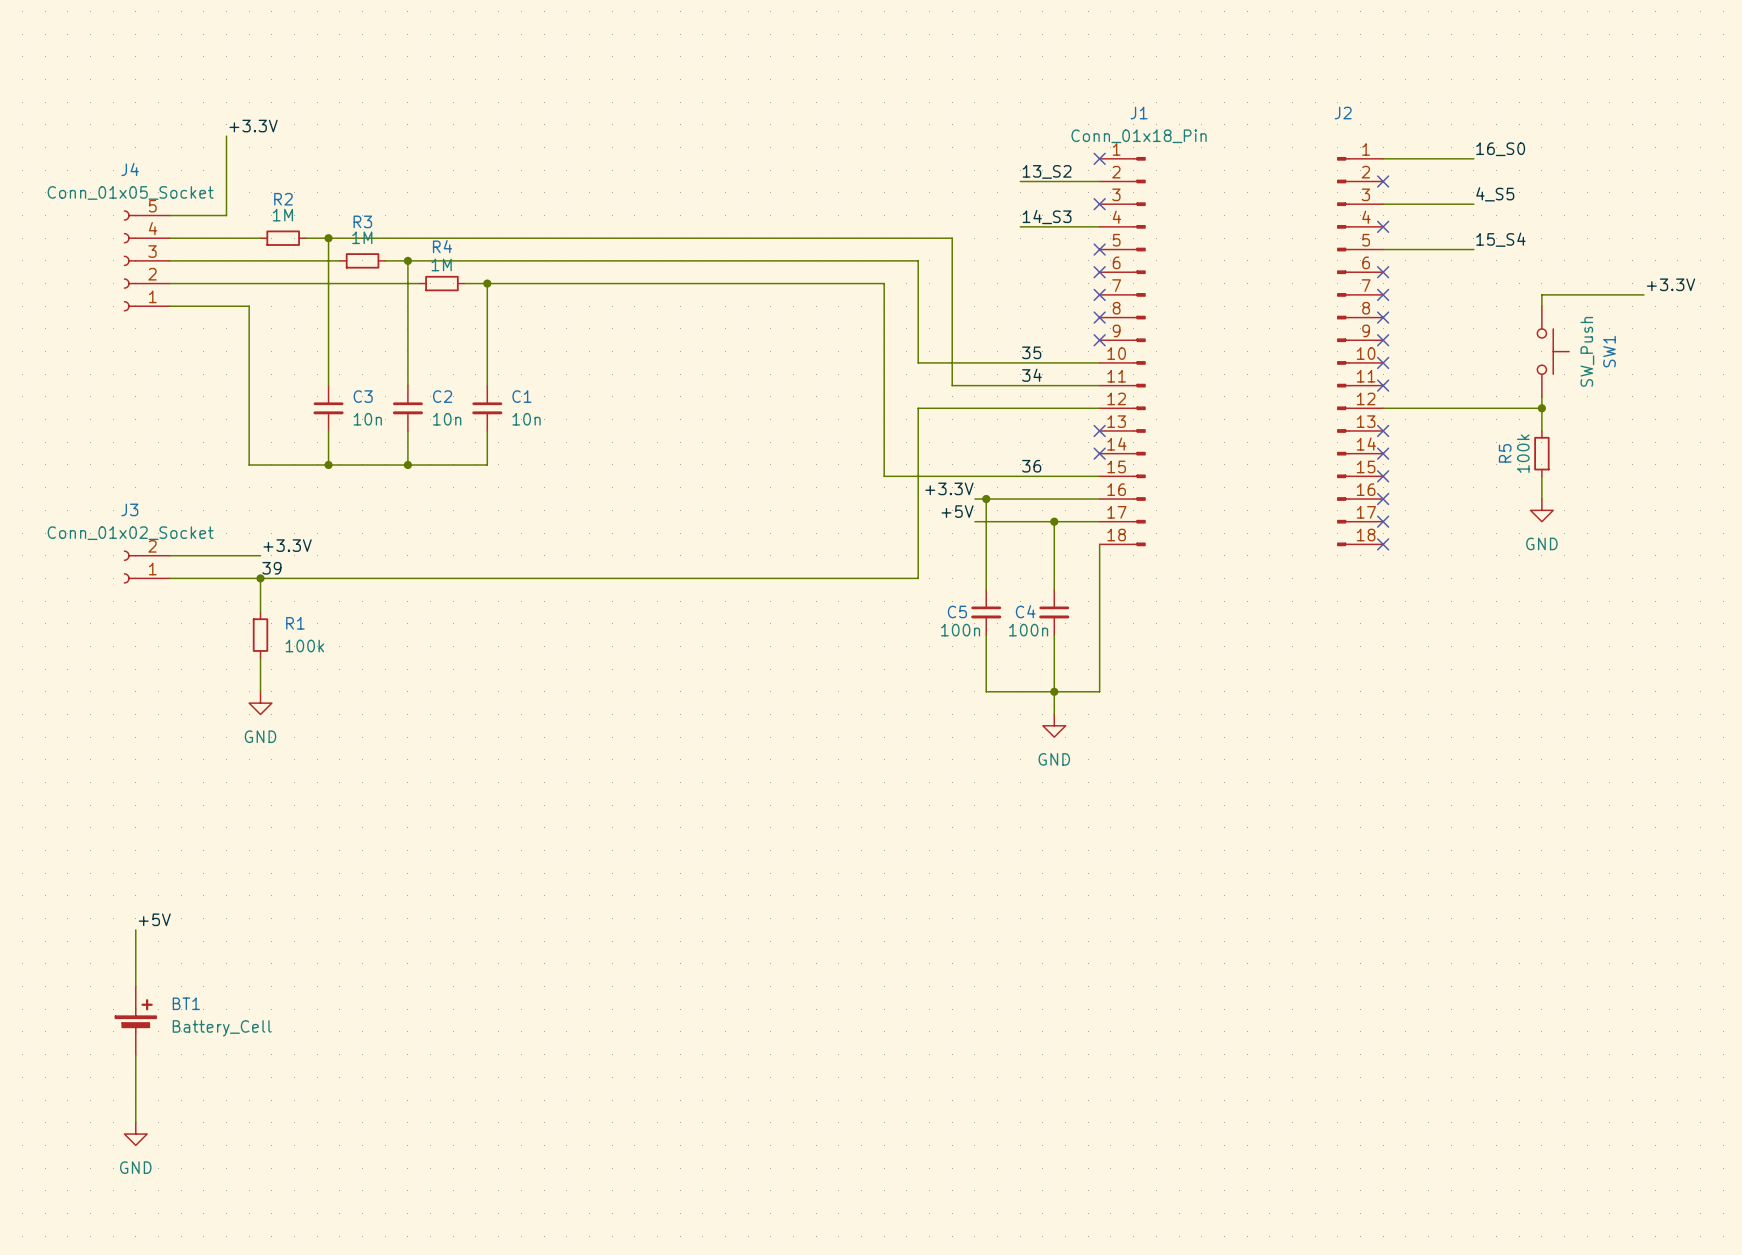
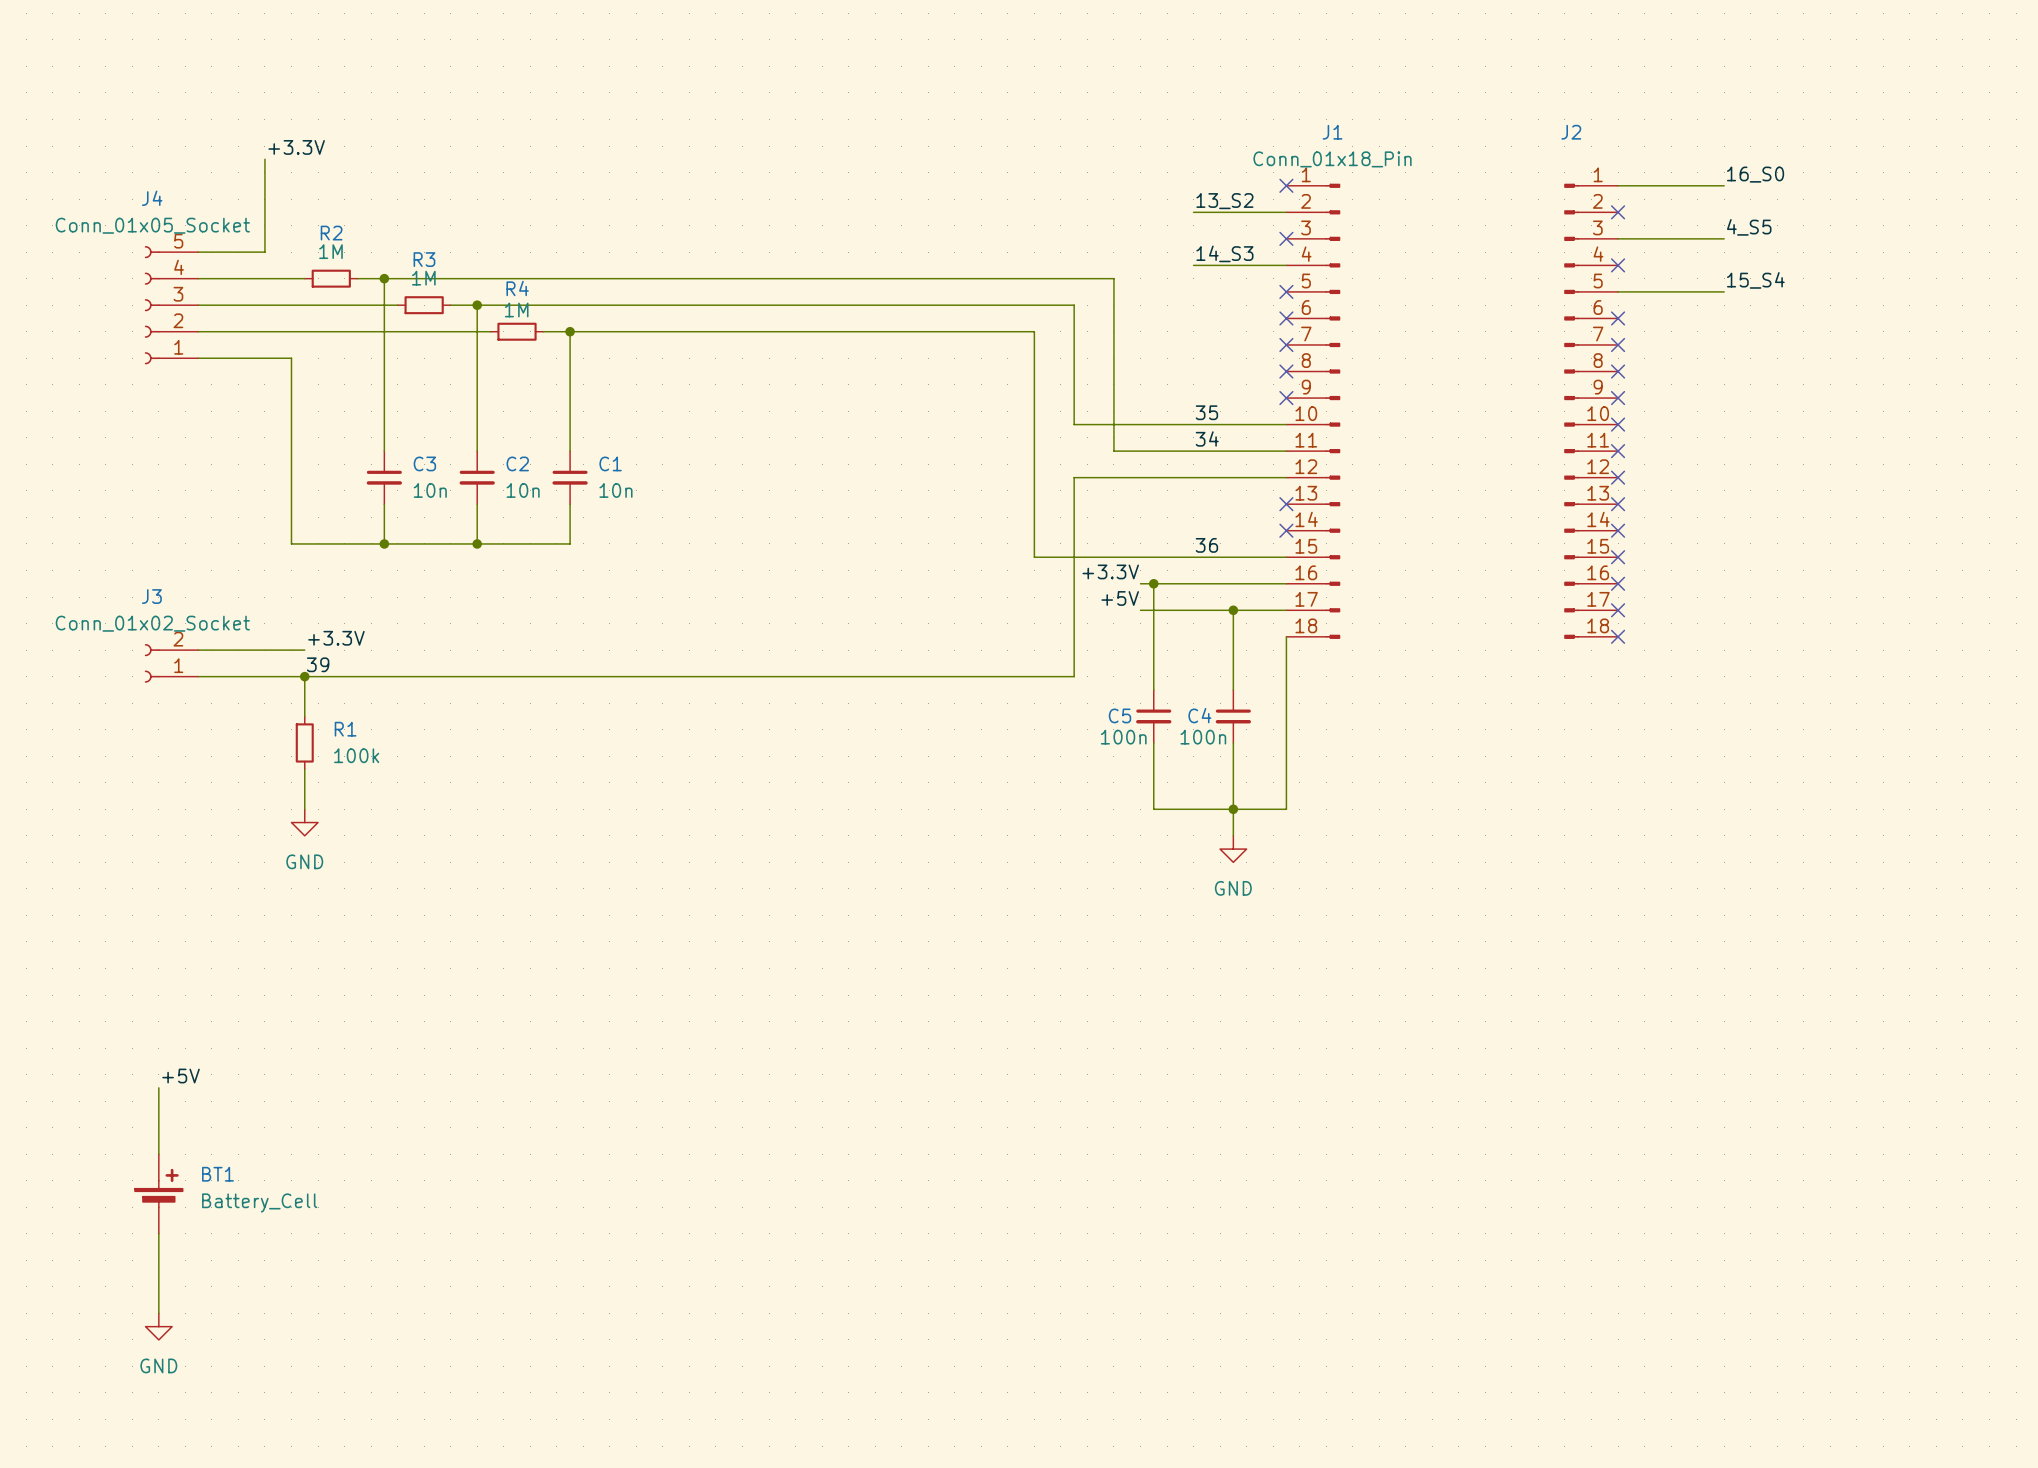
label: +3.3V (1671, 284) -> none
wire: (1643, 294) (1541, 294) (1541, 306) -> none
SW1: SW_Push (1553, 351) -> none
wire: (1541, 396) (1541, 430) -> none
wire: (1383, 408) (1541, 408) -> none
no-connect mark: none -> (1618, 477)
junction: (1541, 408) -> none
R5: 100k (1541, 453) -> none
wire: (1541, 476) (1541, 499) -> none
power symbol: GND (1541, 510) -> none

